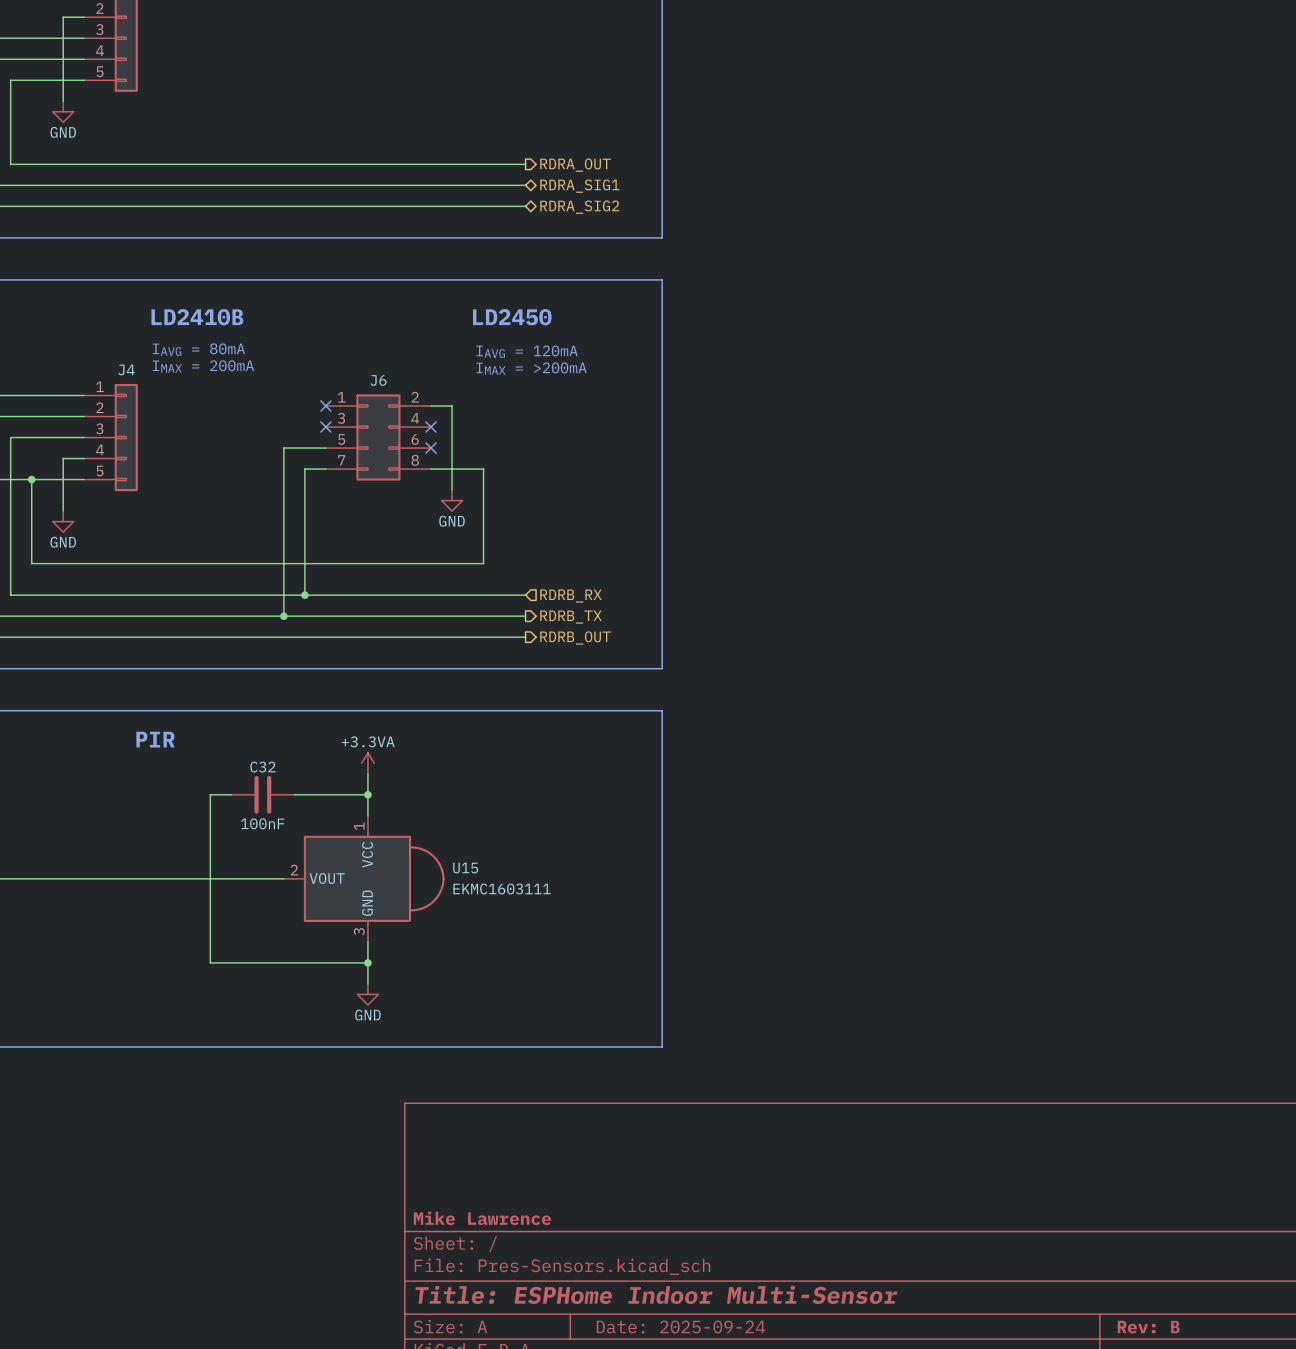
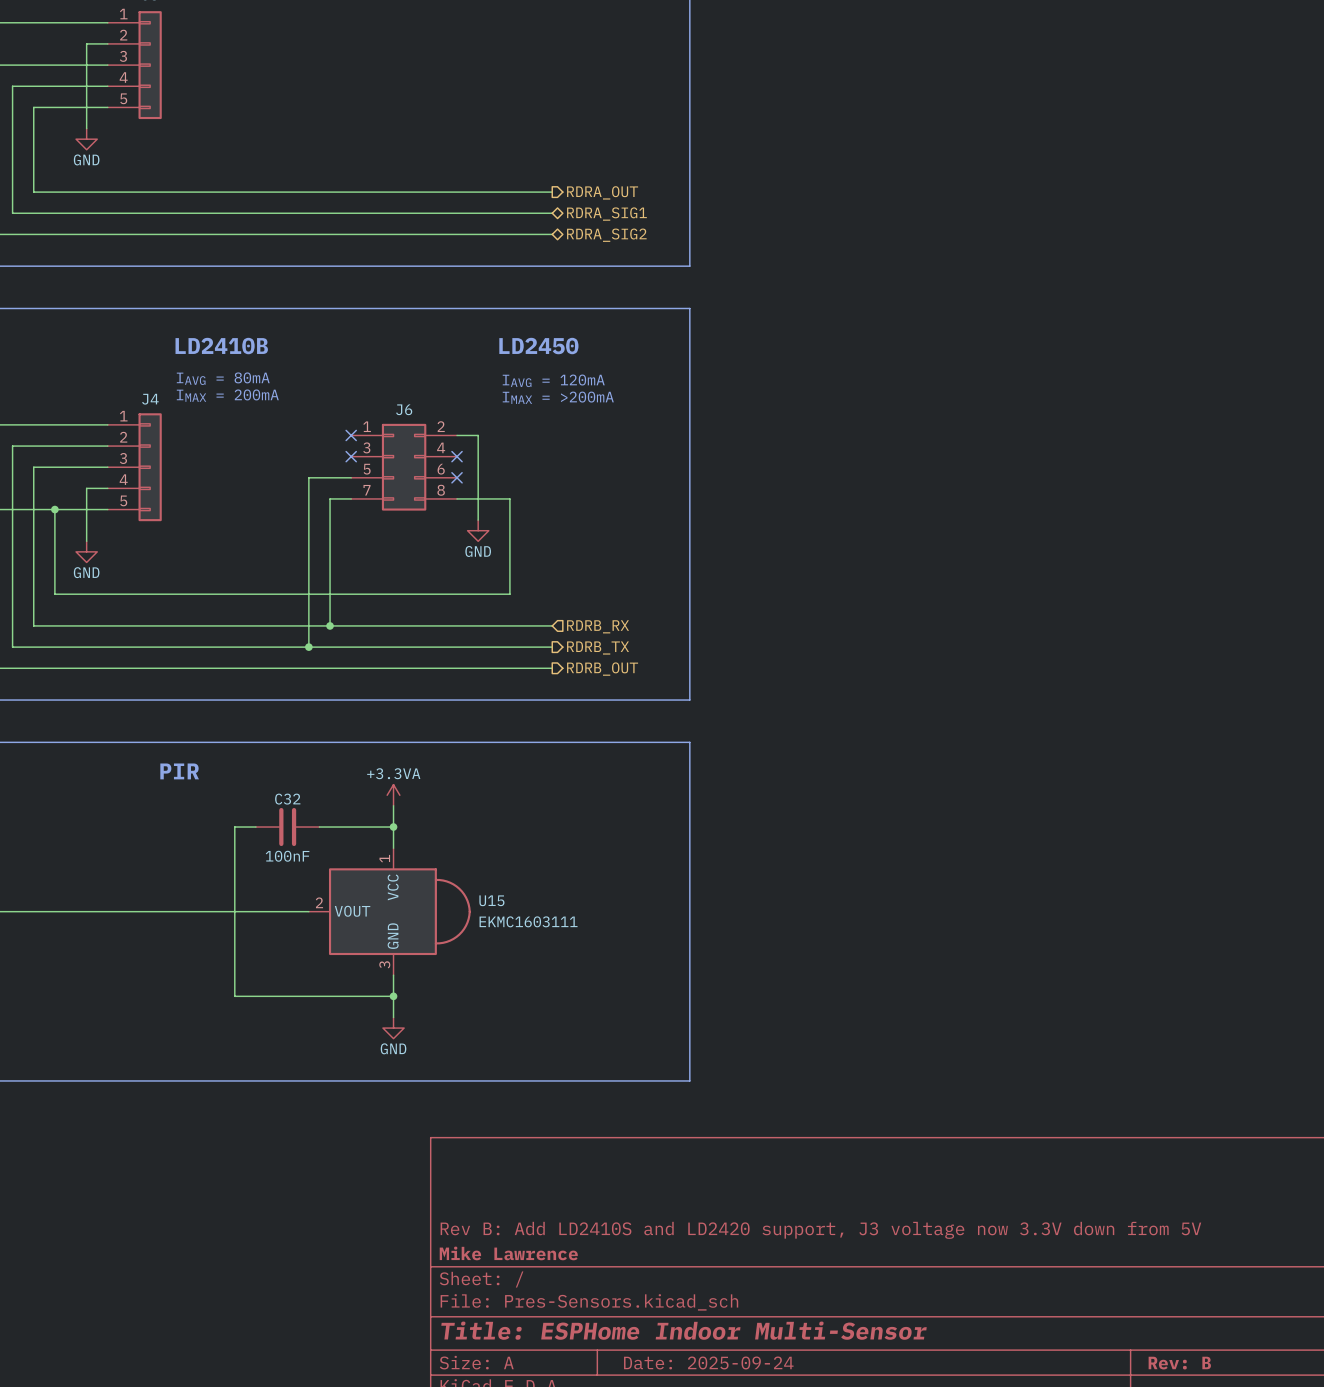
title block: none -> Rev B: Add LD2410S and LD2420 support, J3 voltage now 3.3V down from 5V (820, 1230)

